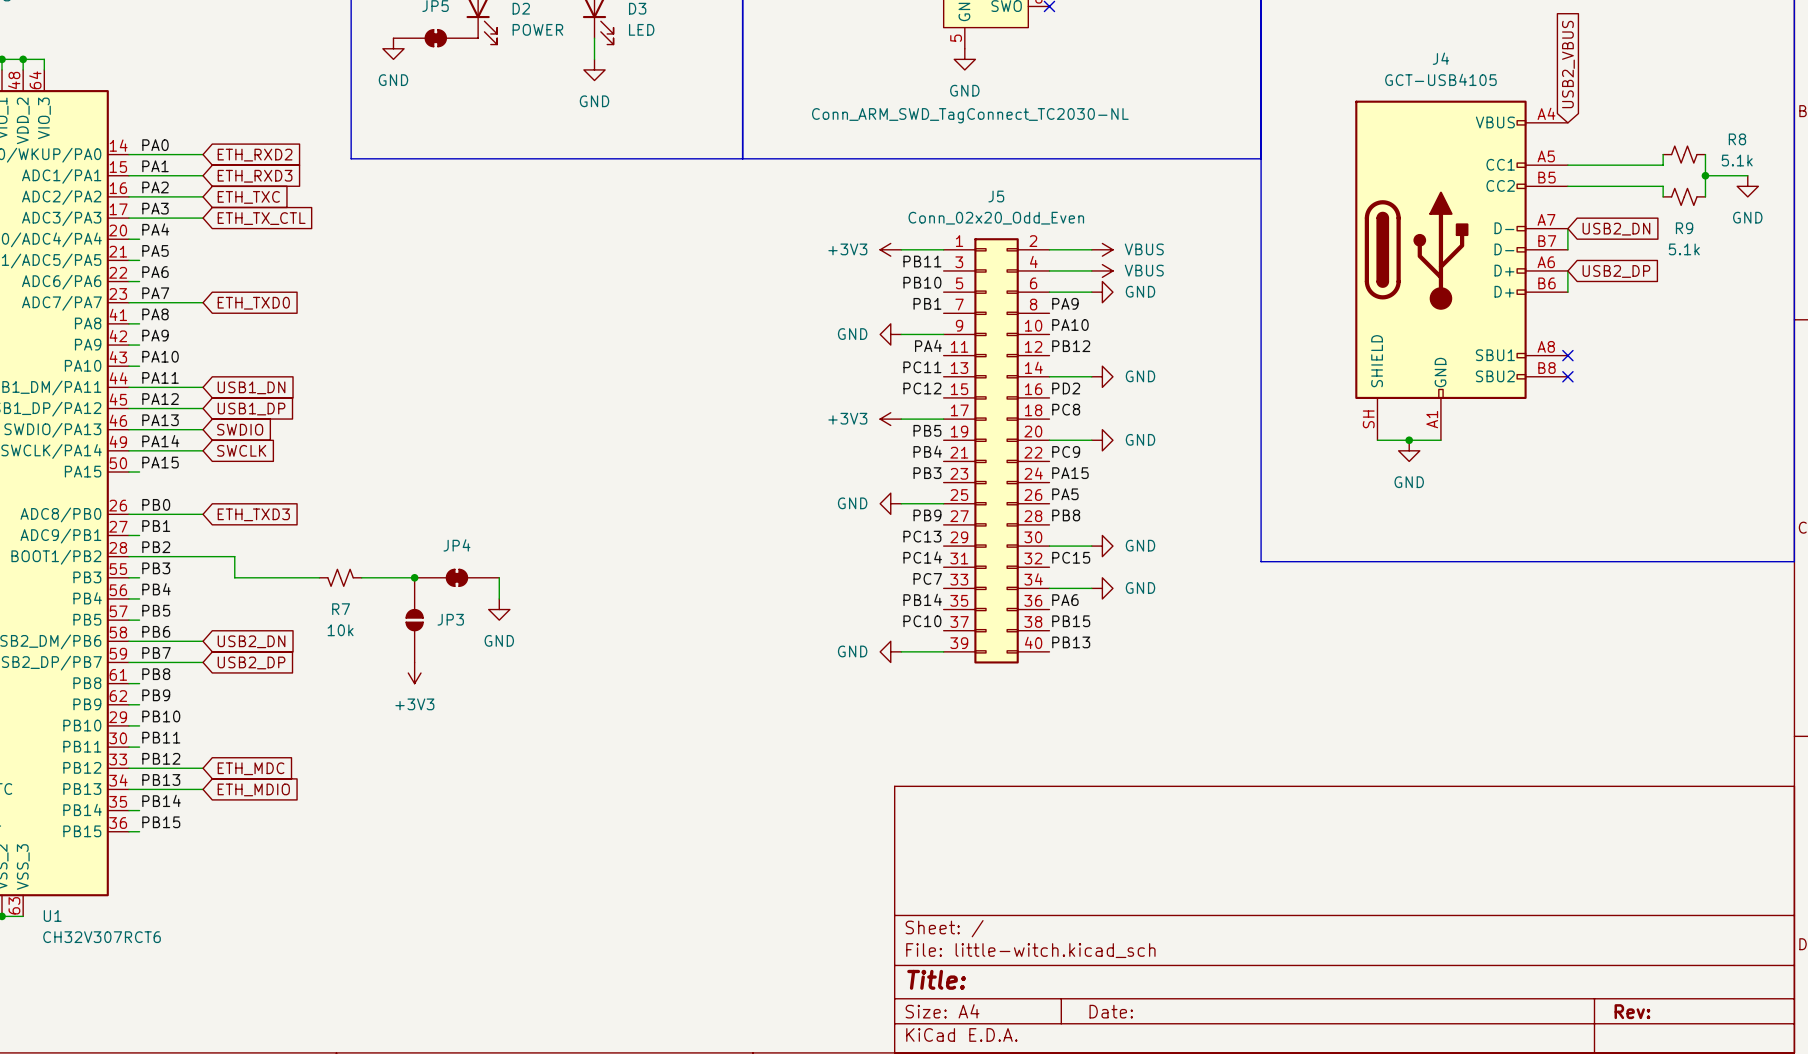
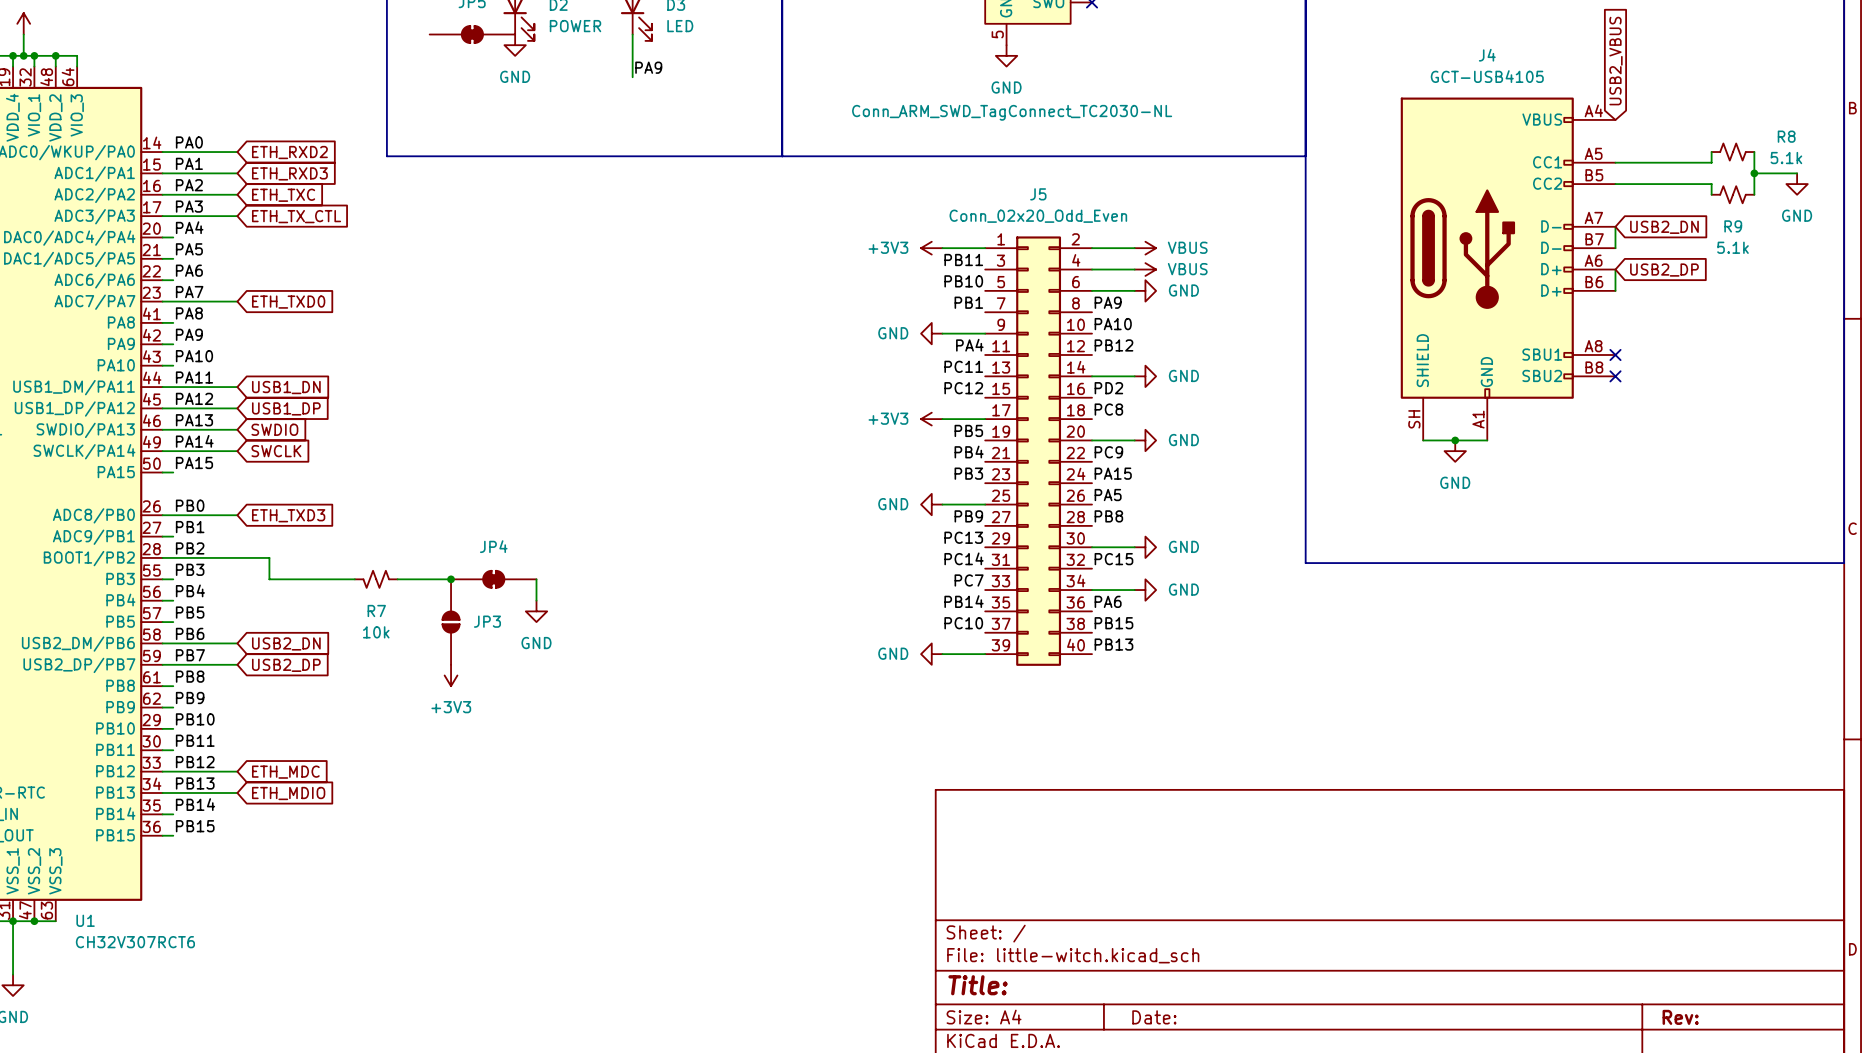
power symbol: GND (393, 48) -> none
power symbol: none -> GND (515, 45)
power symbol: GND (594, 69) -> none
label: none -> PA9 (648, 67)

